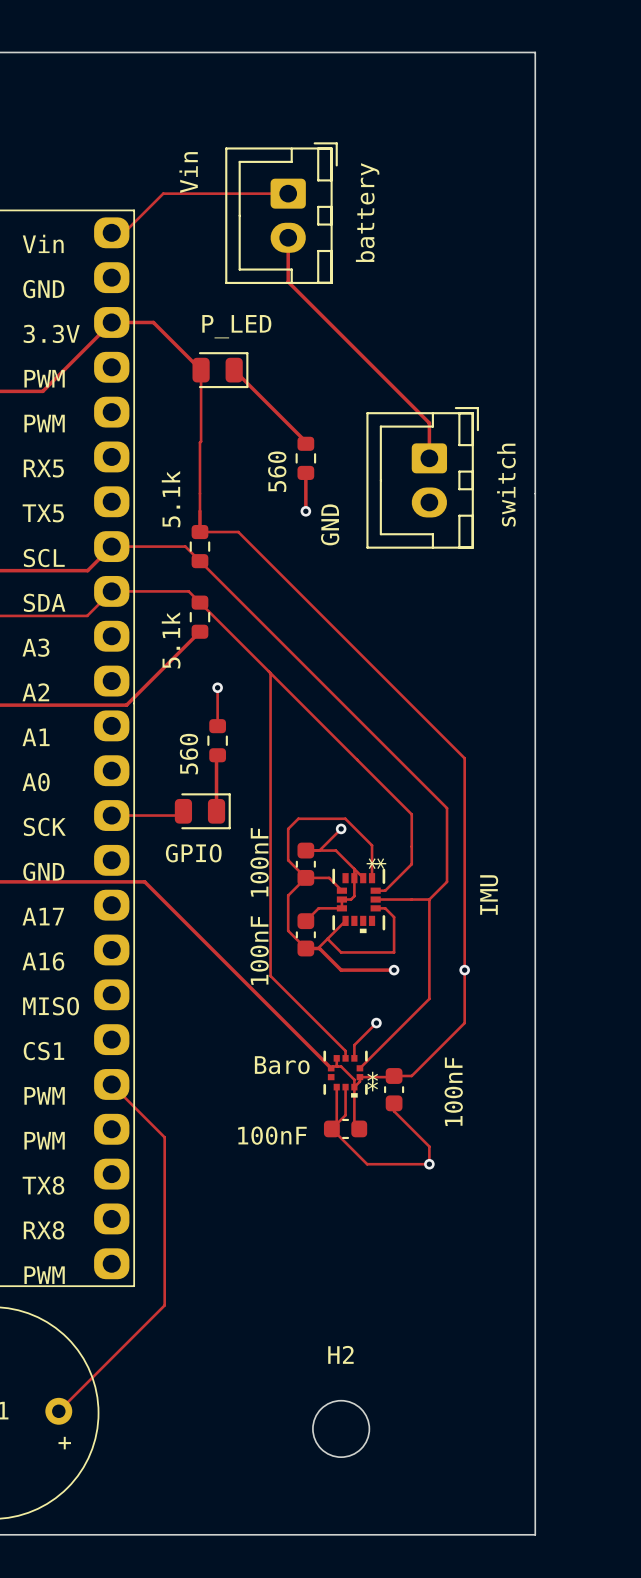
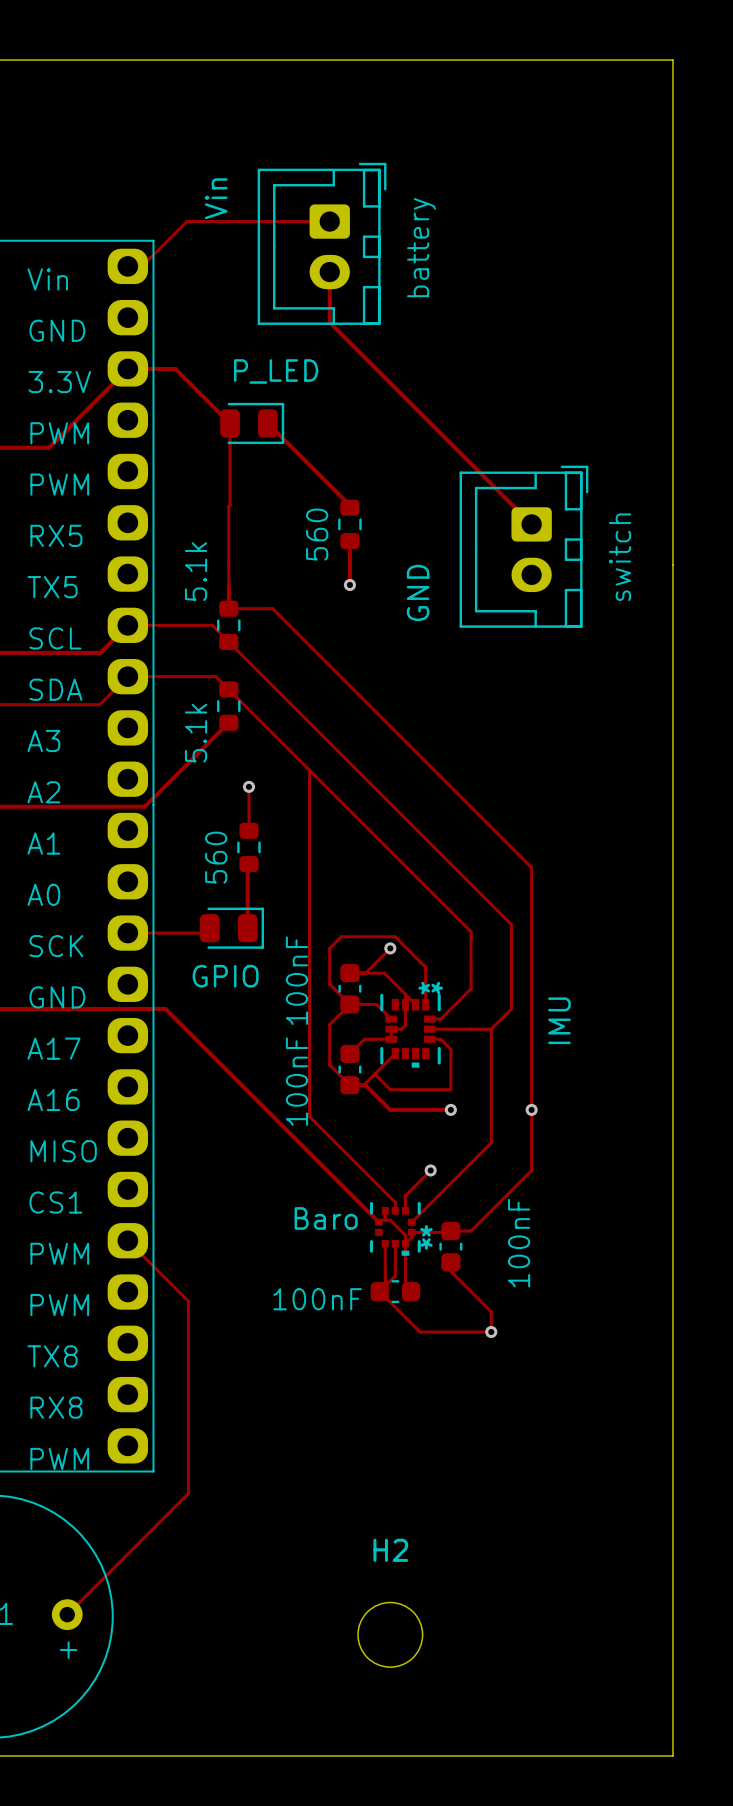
board edge: (535, 52) (535, 1534) -> (612, 60) (672, 60) (672, 1755) (612, 1755)
track: (429, 423) (429, 458) -> (491, 484) (531, 524)
part position: (422, 477) -> (523, 546)
text position: switch (506, 485) -> switch (620, 557)
text position: GND (330, 524) -> GND (418, 592)

